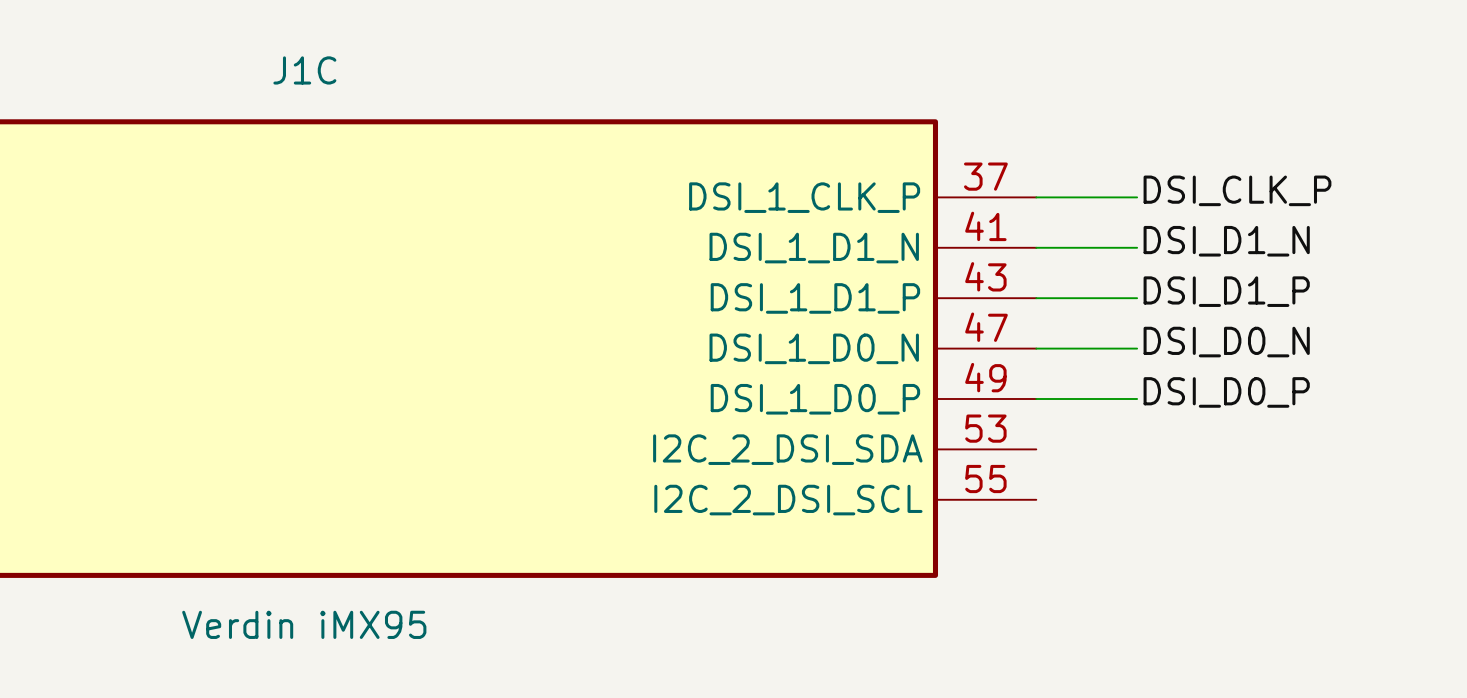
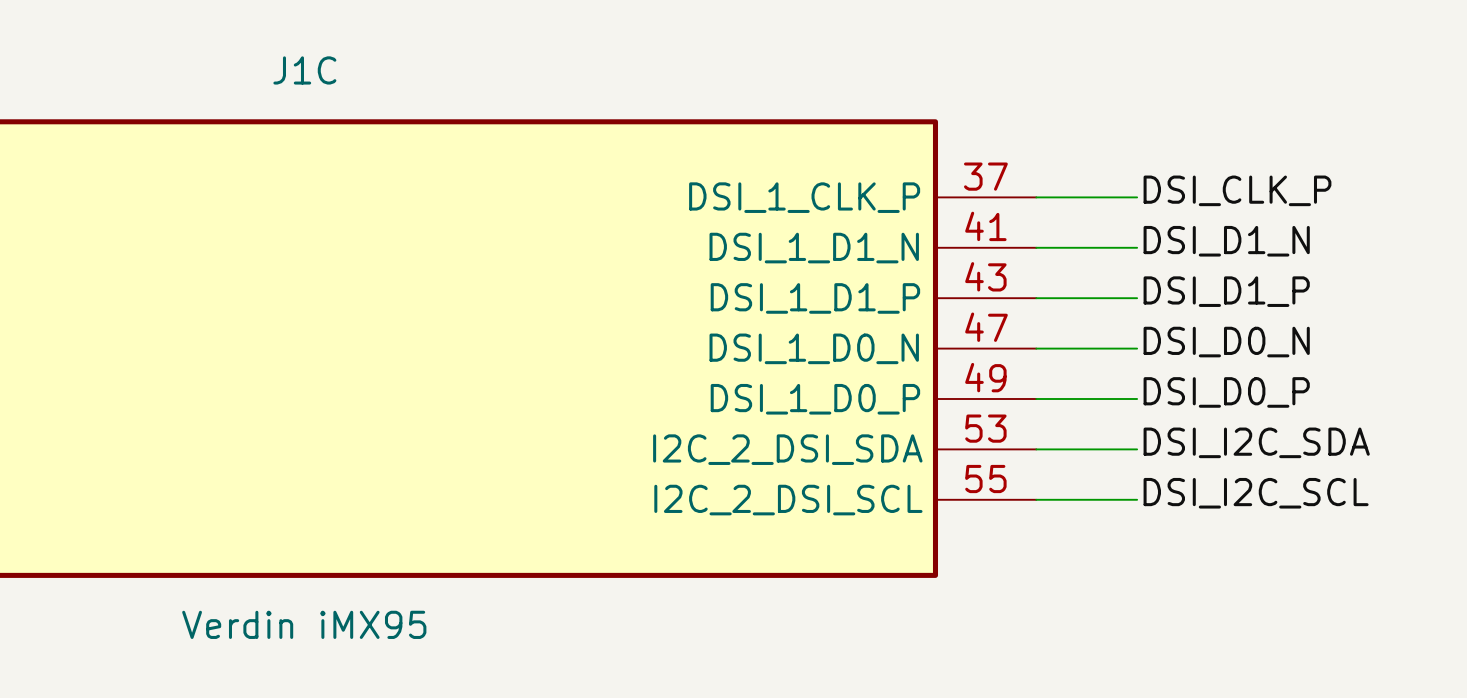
label: none -> DSI_I2C_SDA (1256, 442)
wire: none -> (1036, 449) (1137, 449)
label: none -> DSI_I2C_SCL (1256, 493)
wire: none -> (1036, 499) (1137, 499)

